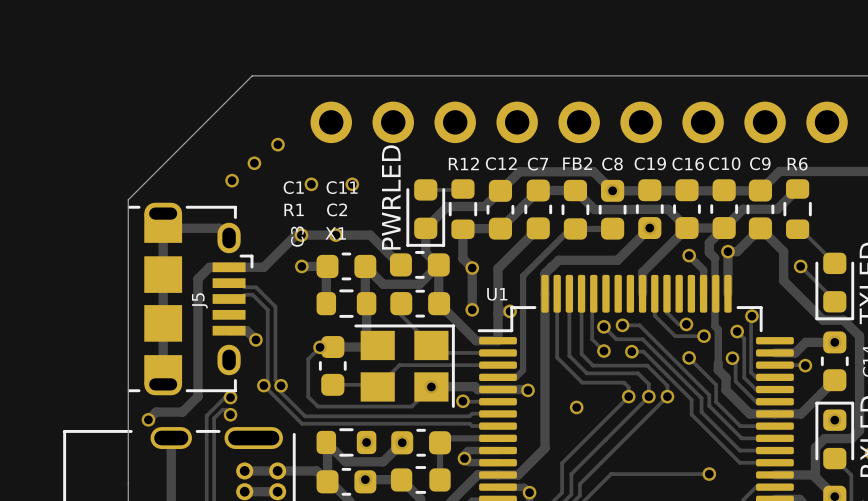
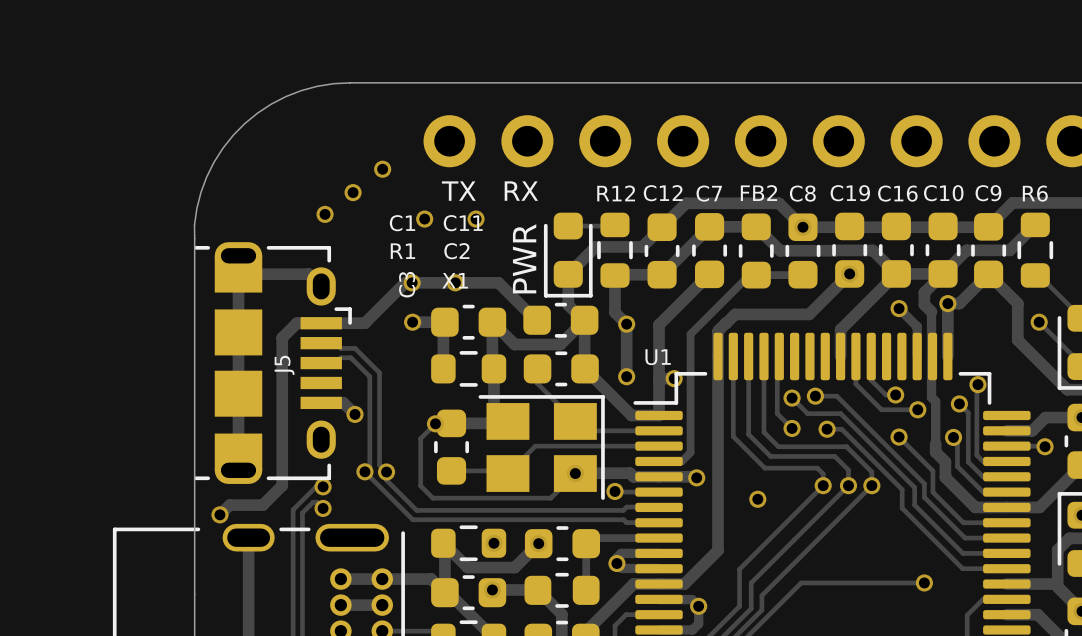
board edge: (252, 75) (128, 199) -> (350, 82) (317, 86) (301, 90) (271, 104) (244, 123) (222, 148) (206, 177) (196, 208) (194, 238)
text: none -> TX RX (489, 191)
part value: PWRLED (391, 197) -> PWR (524, 258)

